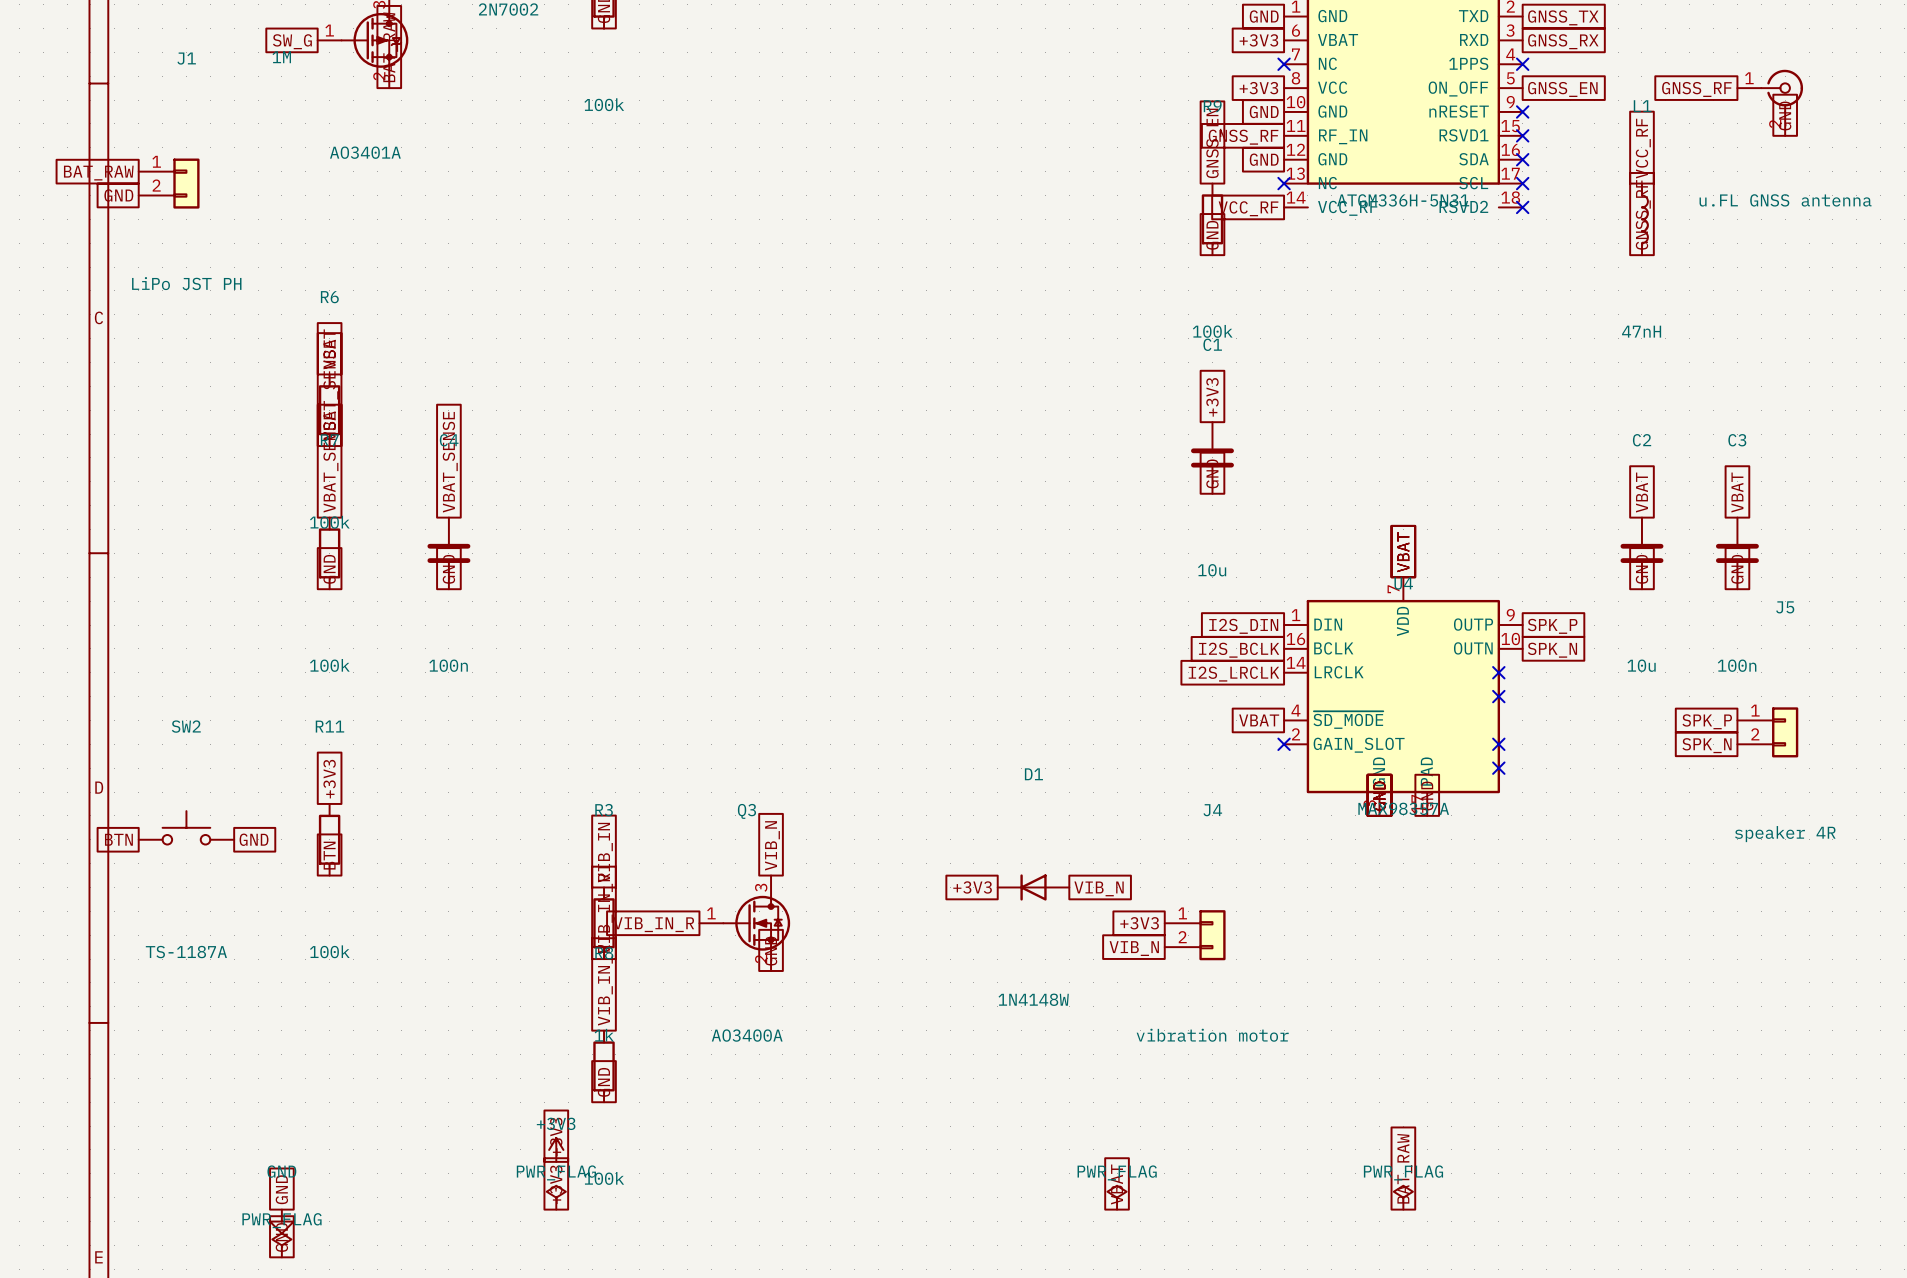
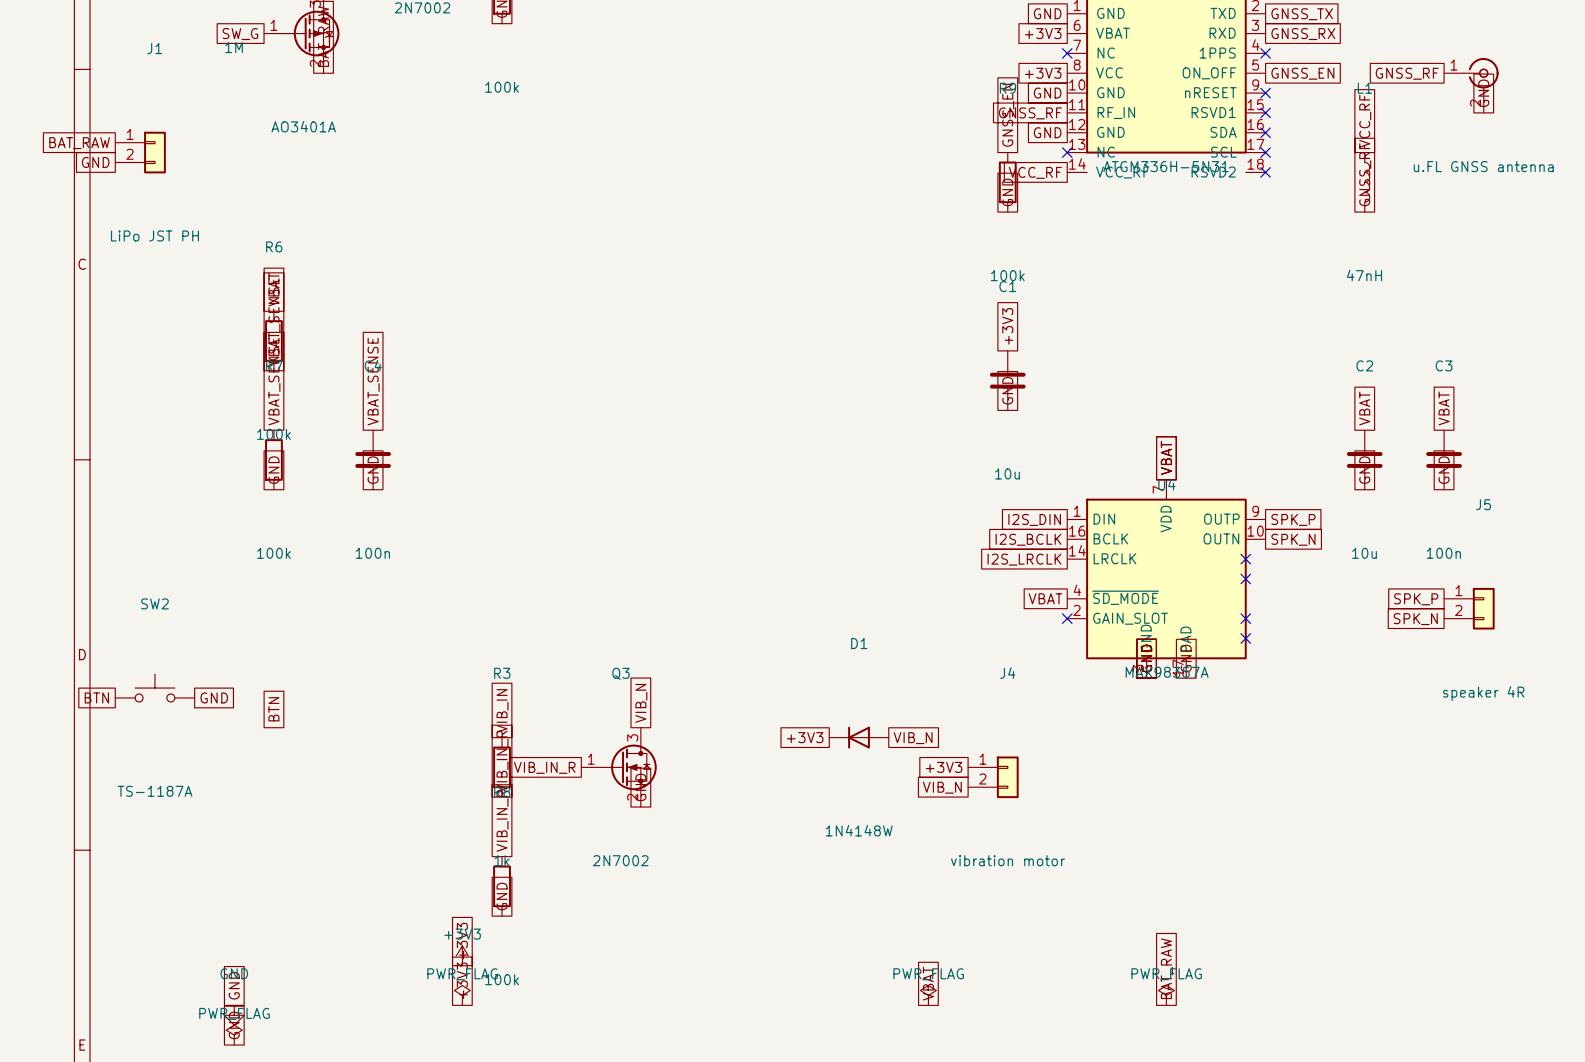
global label: +3V3 (329, 779) -> none
R11: 100k (329, 839) -> none
Q3 value: AO3400A (747, 1035) -> 2N7002 (620, 860)

